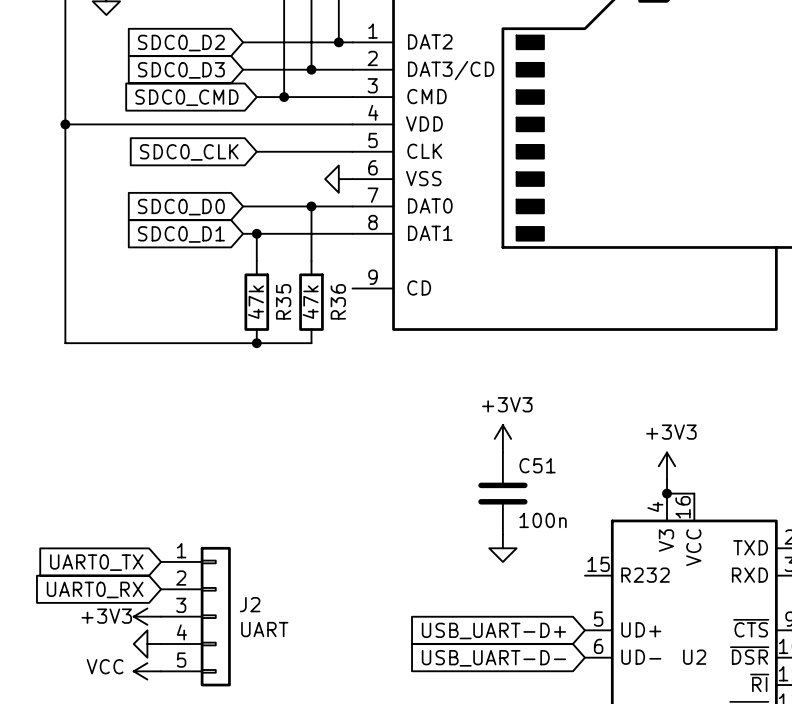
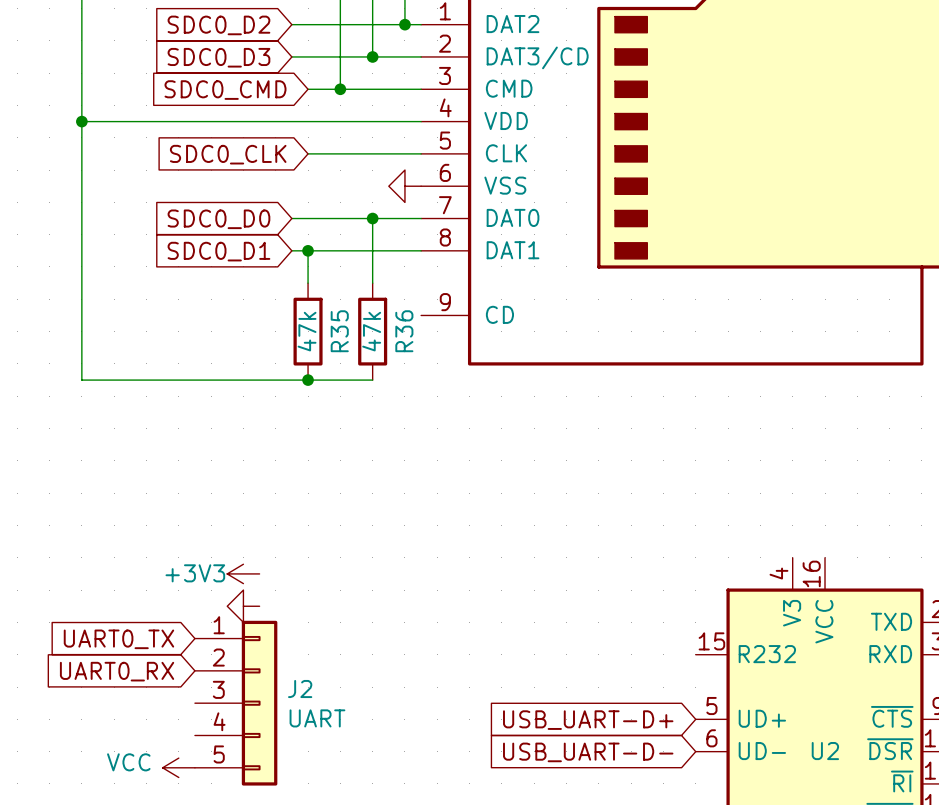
power symbol: +3V3 (502, 438) -> none
power symbol: +3V3 (666, 466) -> none
wire: (666, 479) (666, 493) (694, 493) -> none
C51: 100n (502, 493) -> none
junction: (666, 493) -> none
power symbol: (502, 548) -> none
power symbol position: +3V3 (147, 616) -> +3V3 (243, 573)
power symbol position: (147, 644) -> (243, 606)

